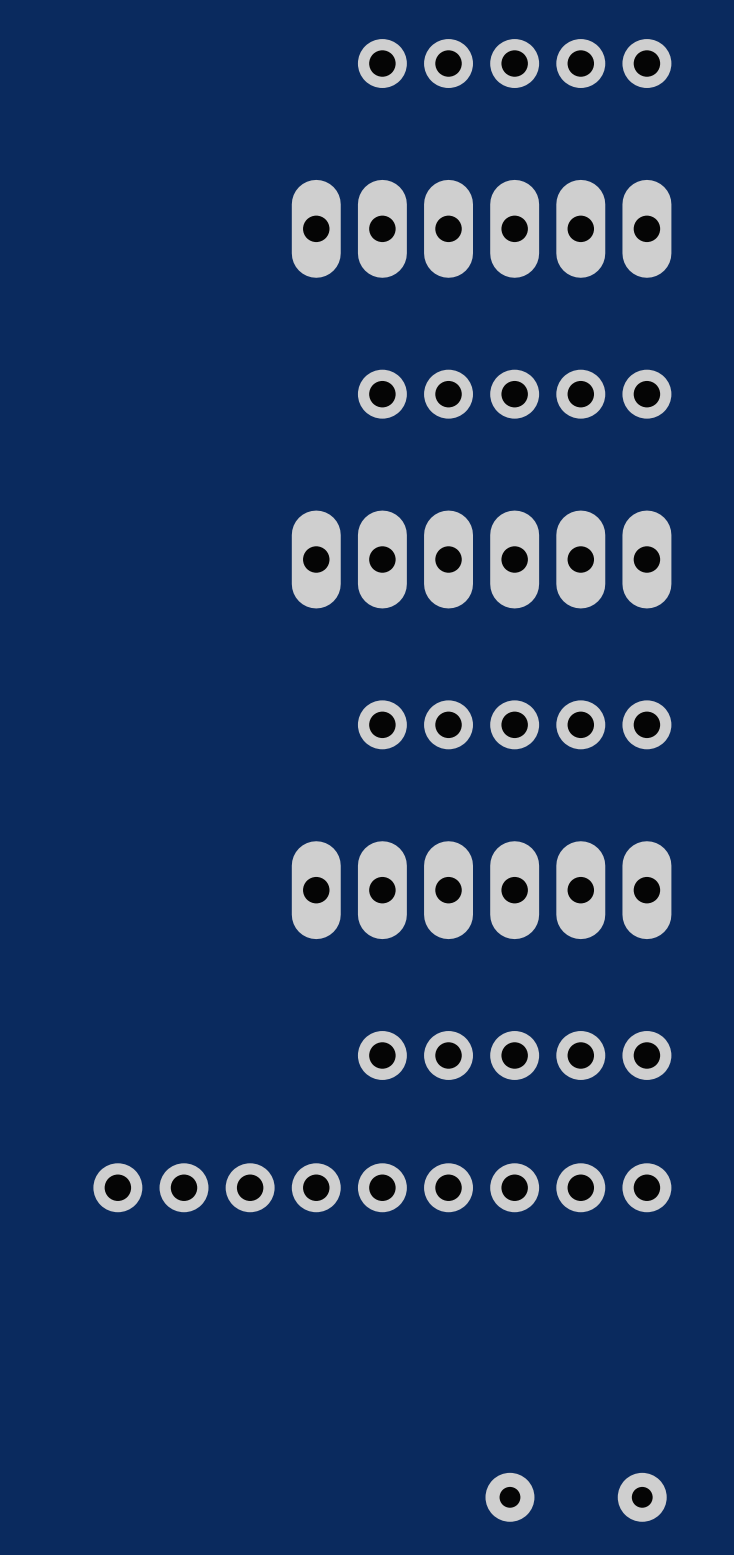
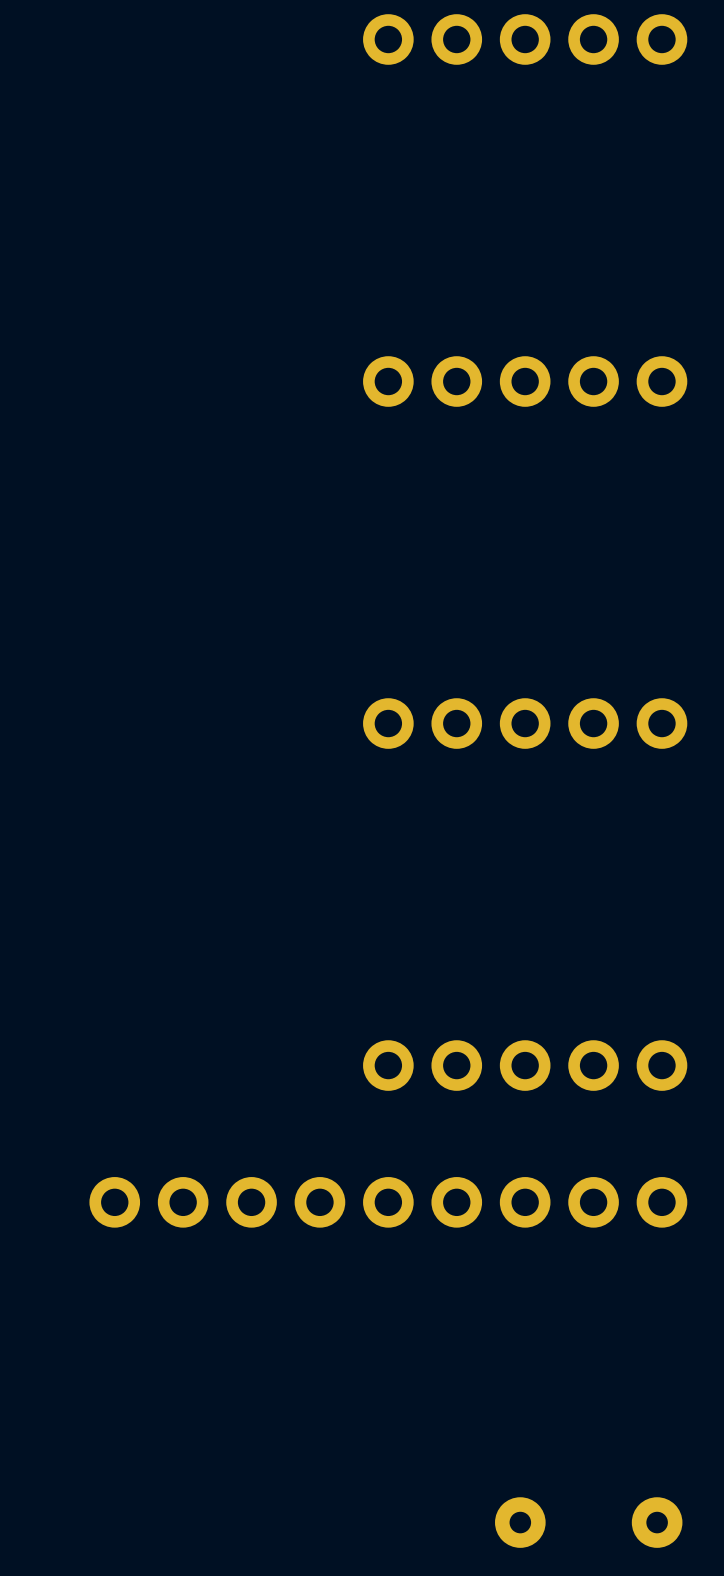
part: (481, 228) -> none
part: (481, 559) -> none
part: (481, 890) -> none

